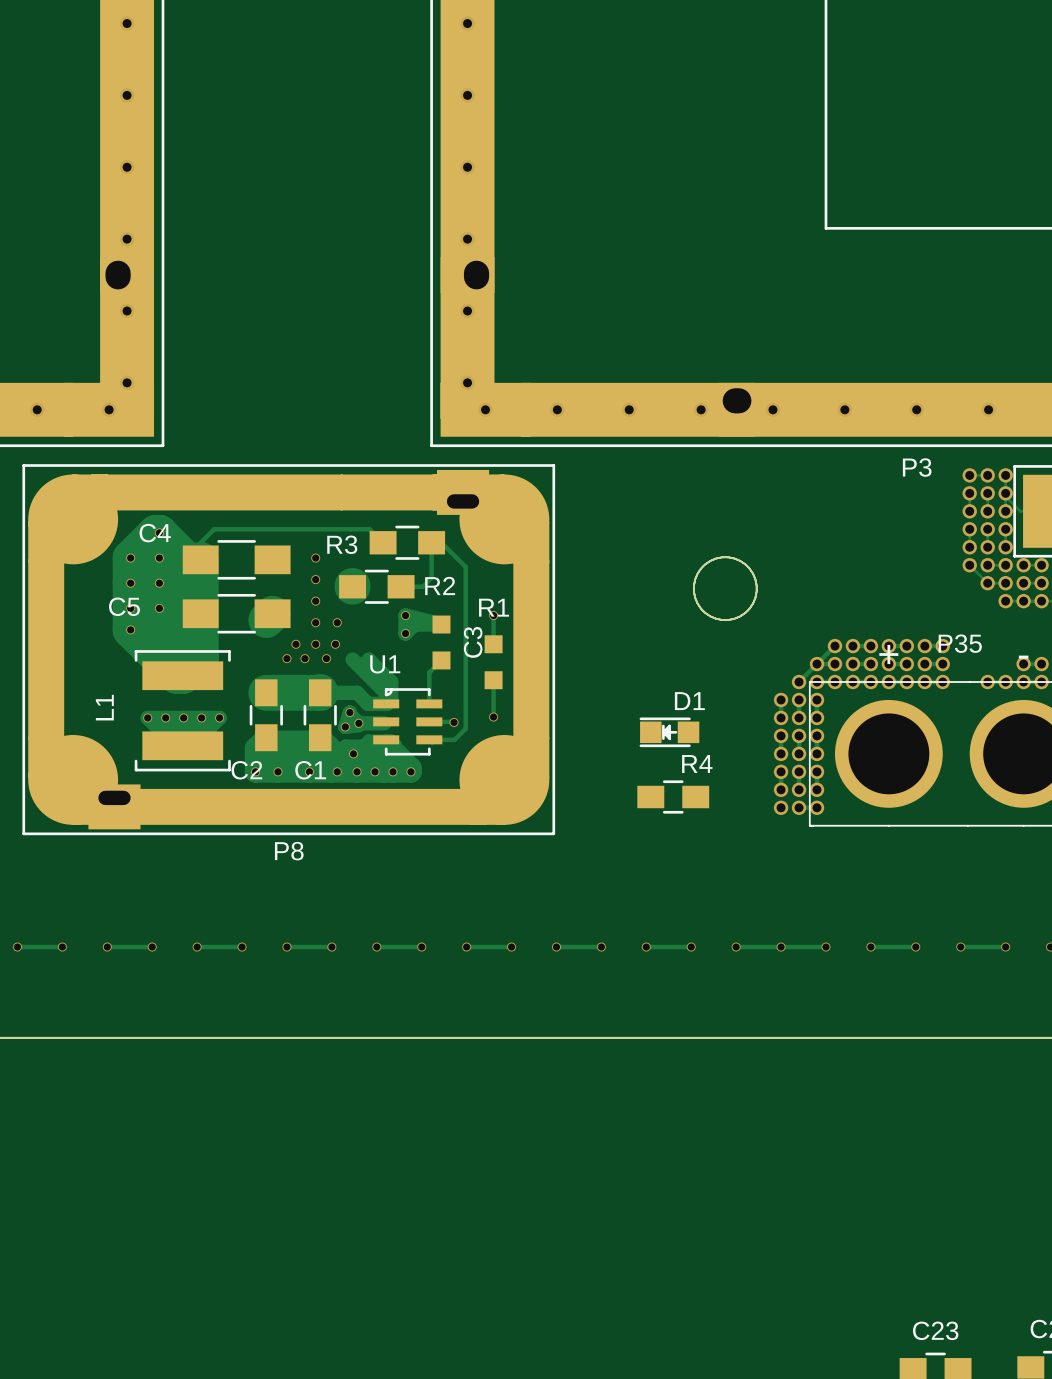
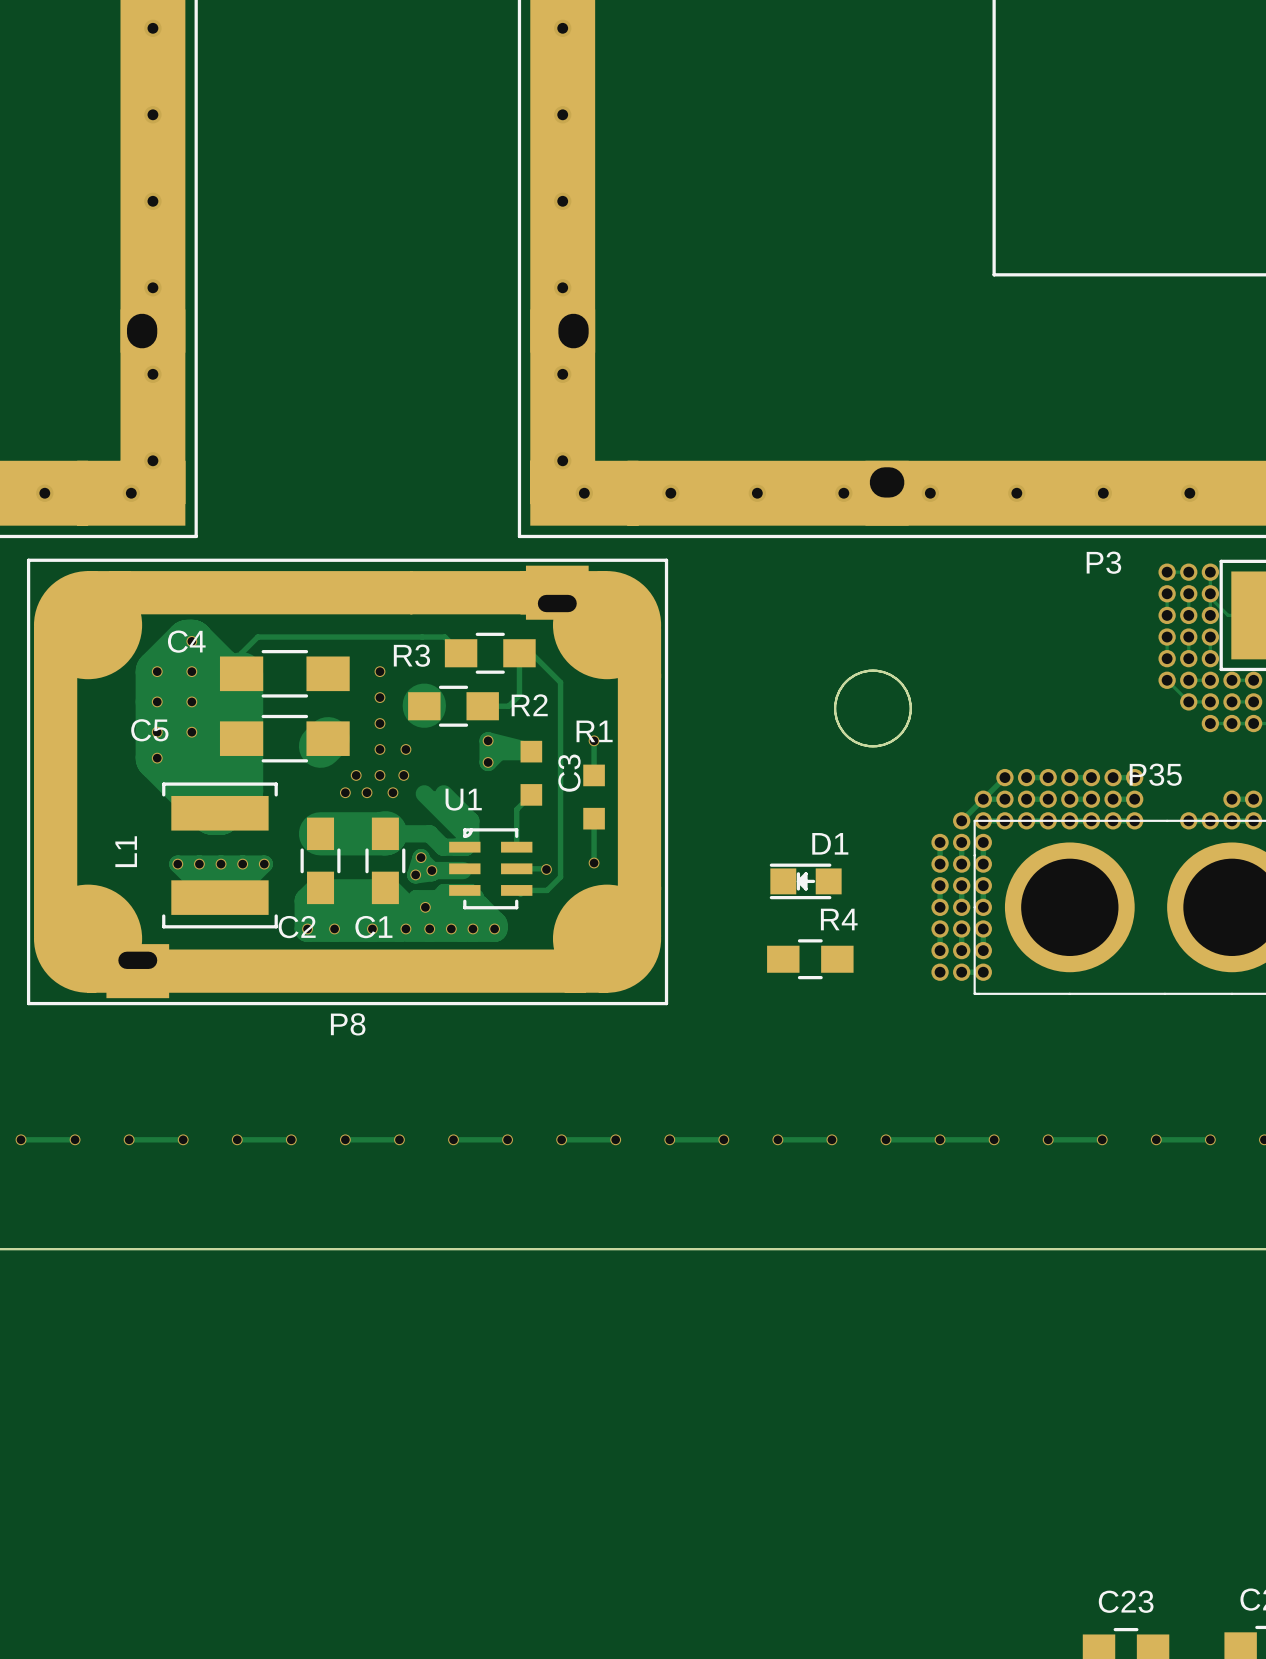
text: + (888, 654) -> none
text: - (1023, 657) -> none

